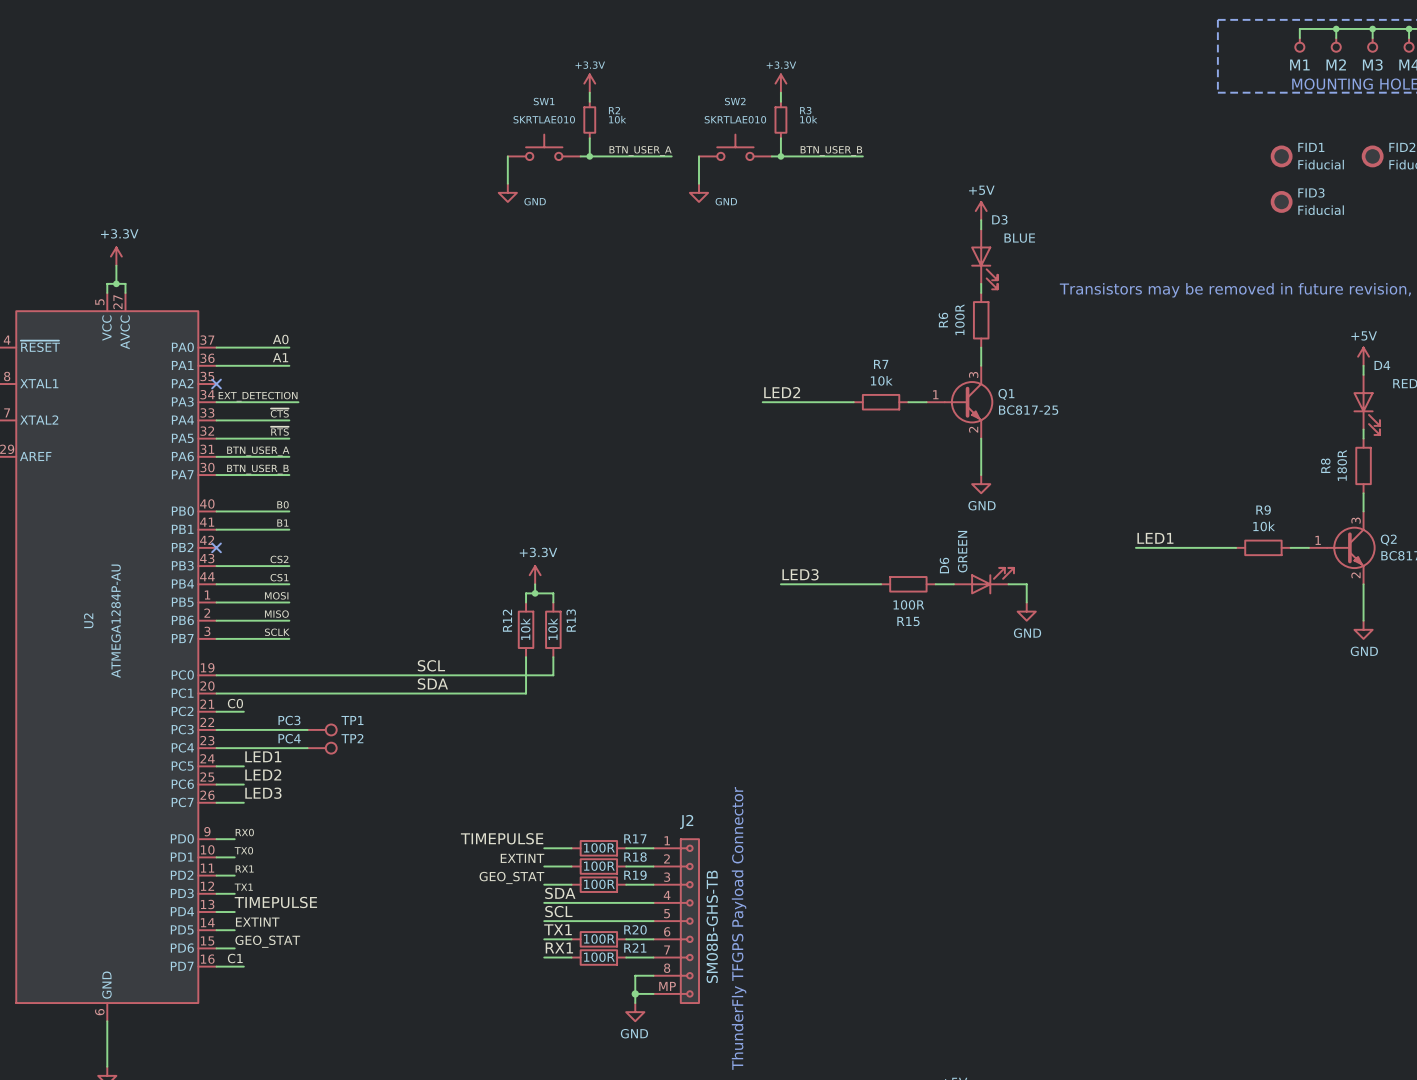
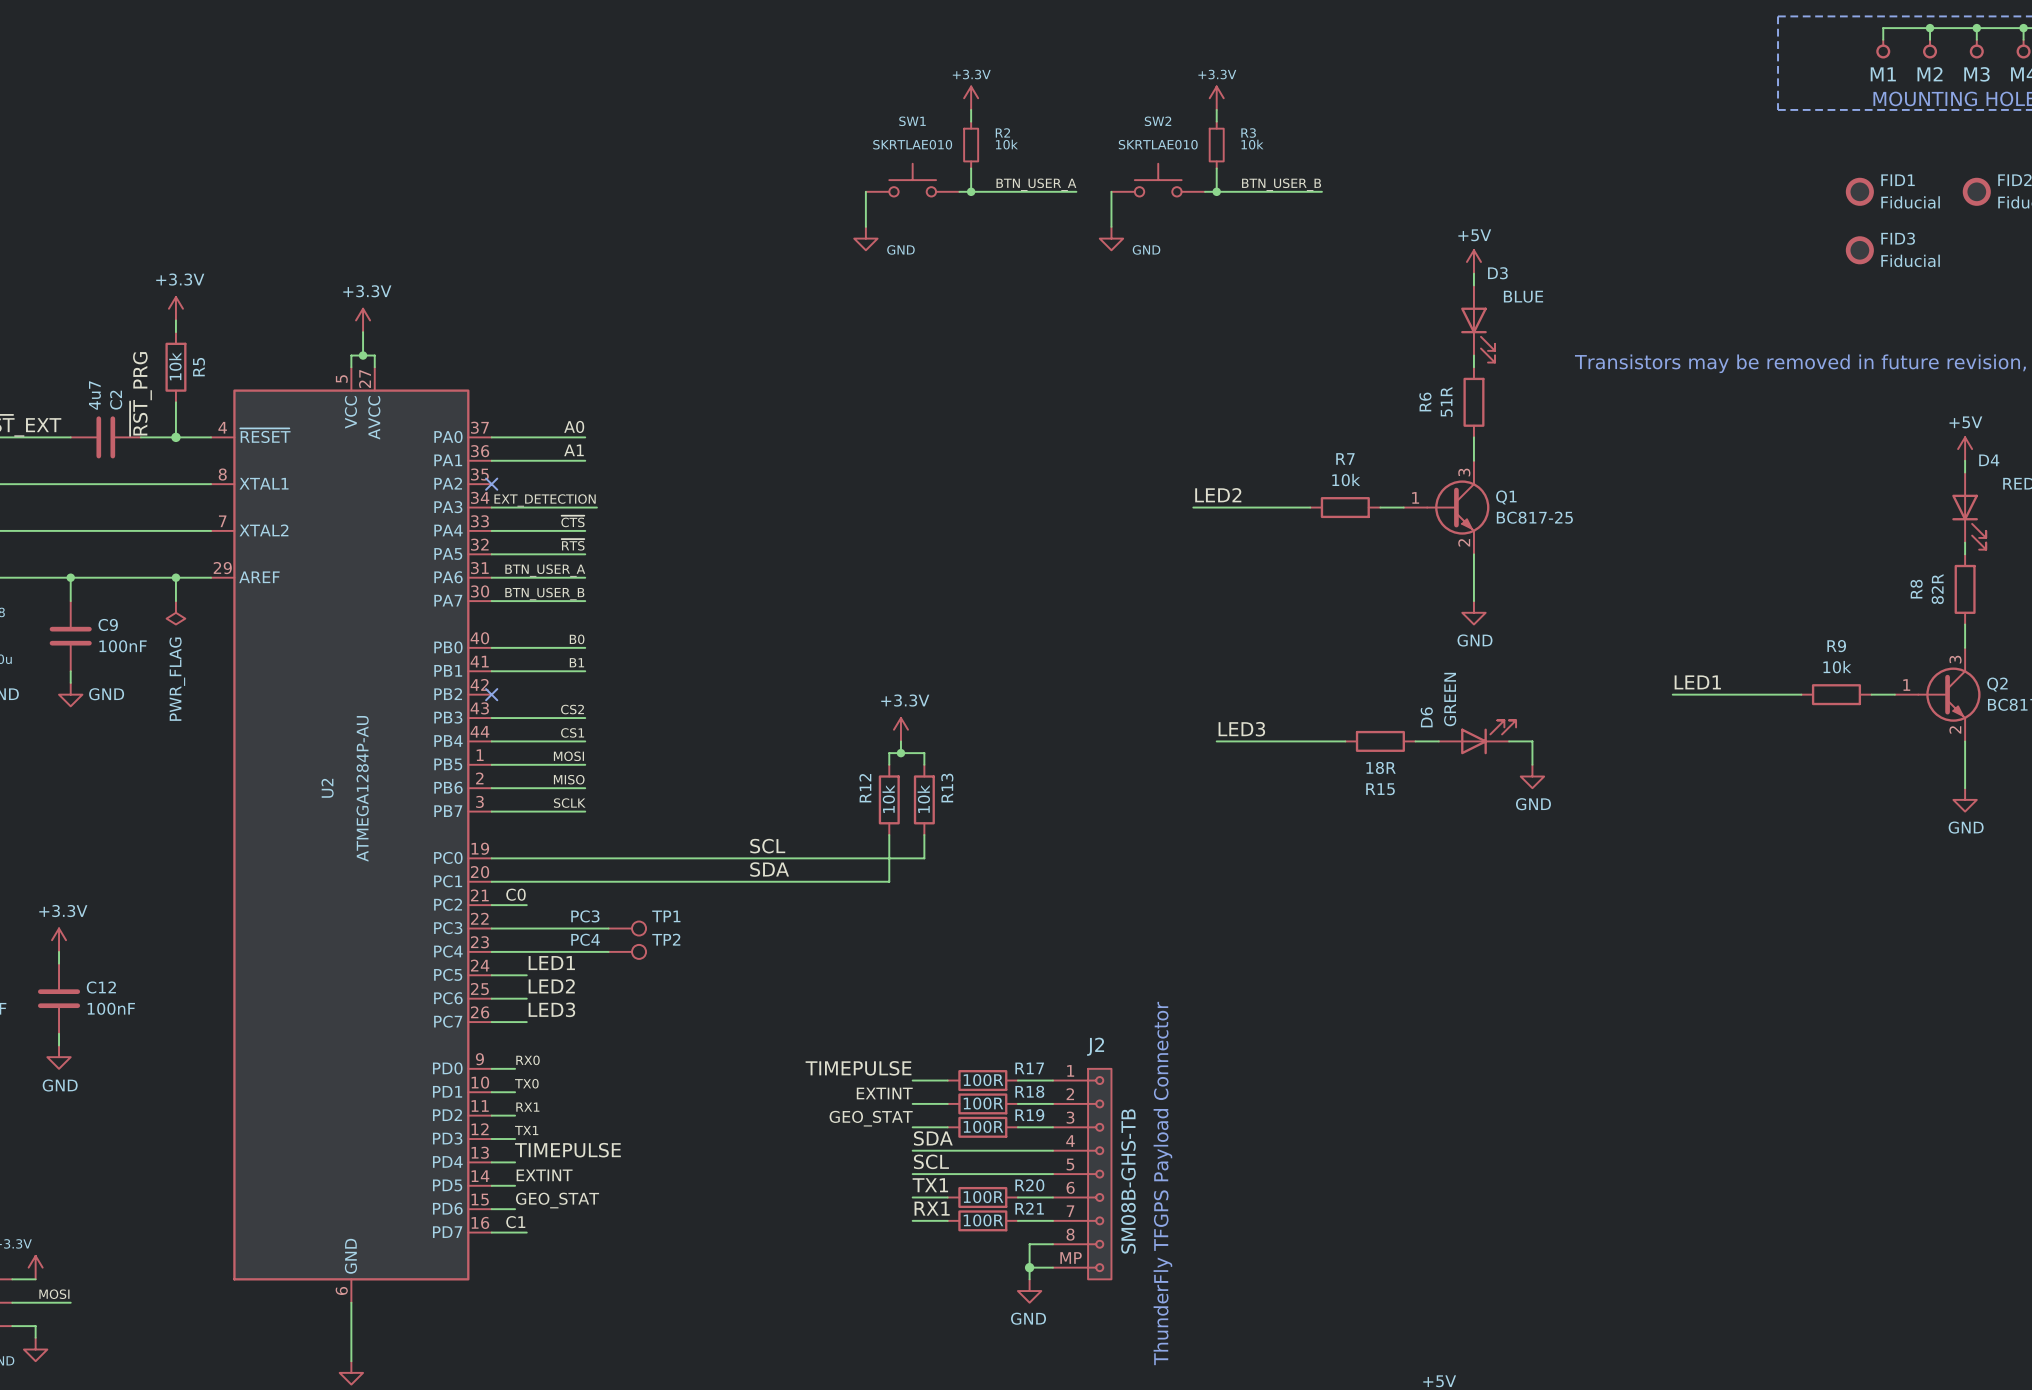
R6 value: 100R (959, 319) -> 51R (1446, 401)
R8 value: 180R (1342, 465) -> 82R (1937, 589)
R15 value: 100R (908, 604) -> 18R (1381, 767)

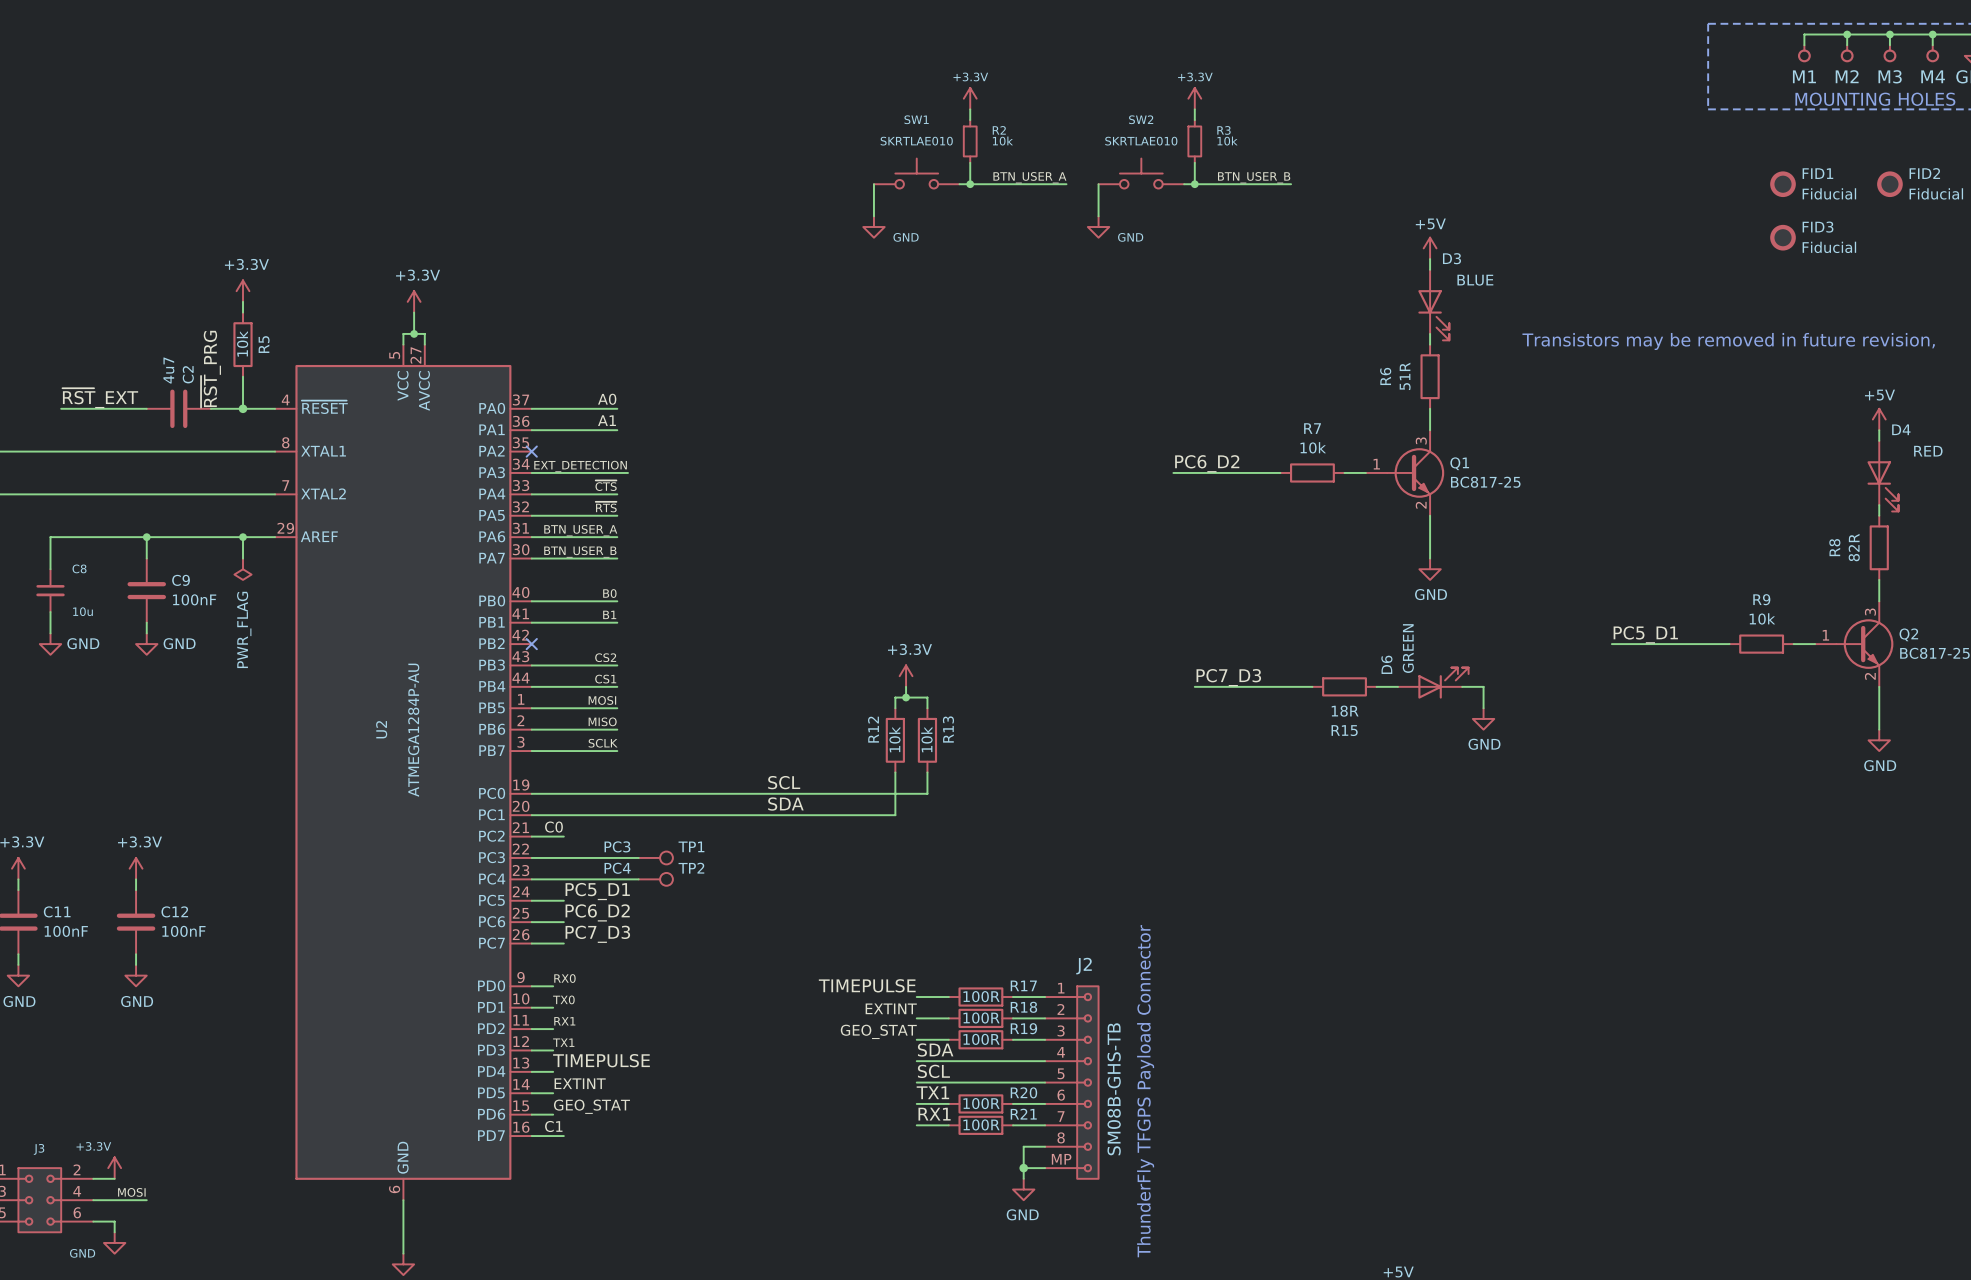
label: LED2 (1218, 495) -> PC6_D2 (1207, 463)
label: LED1 (1697, 682) -> PC5_D1 (1645, 634)
label: LED3 (1241, 729) -> PC7_D3 (1228, 677)
label: LED1 (551, 963) -> PC5_D1 (597, 891)
label: LED2 (551, 986) -> PC6_D2 (597, 912)
label: LED3 (551, 1009) -> PC7_D3 (597, 934)

